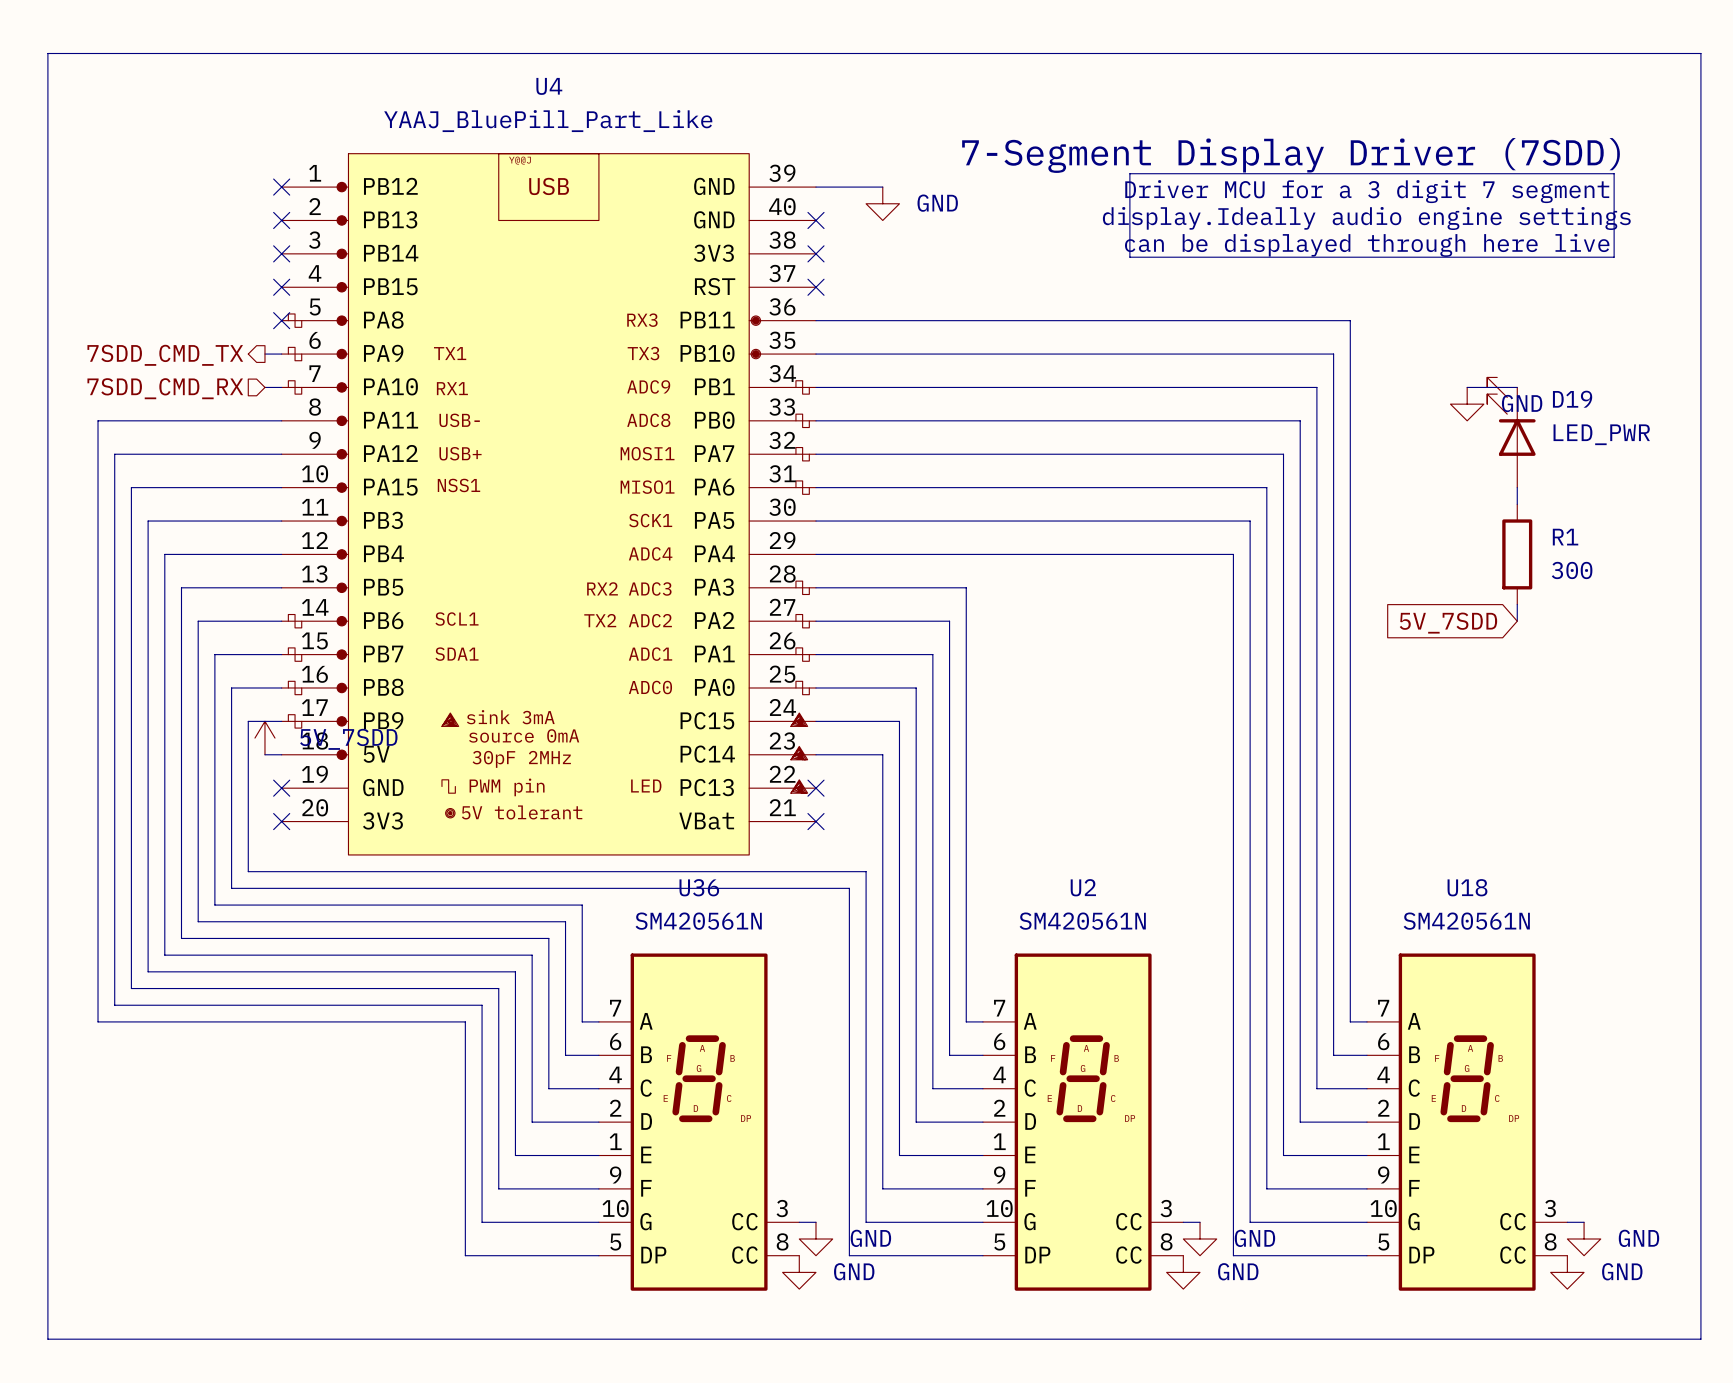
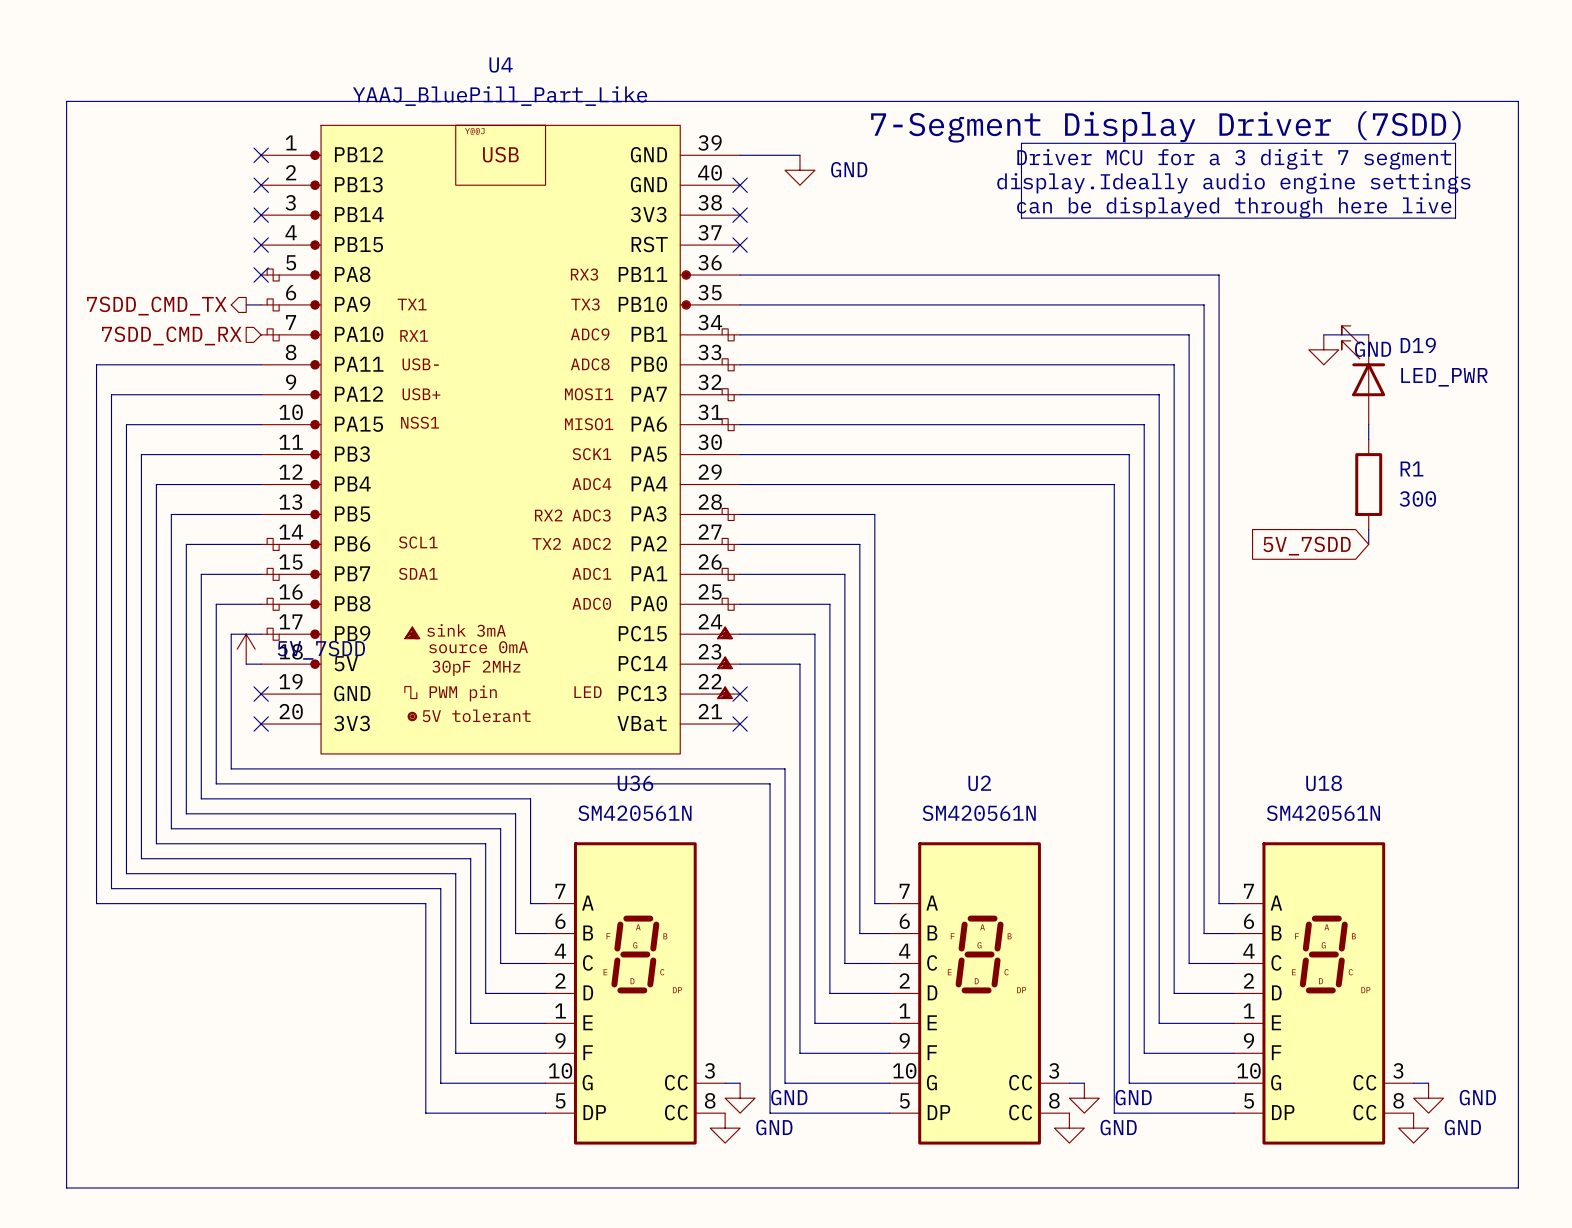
wire: (264, 387) (281, 387) -> none
hierarchical label position: 7SDD_CMD_RX (165, 388) -> 7SDD_CMD_RX (171, 336)
line: (64, 1339) (47, 1339) (47, 53) (1700, 53) (1700, 1339) (1684, 1339) -> (66, 1187) (66, 101) (1518, 101) (1518, 1187)

